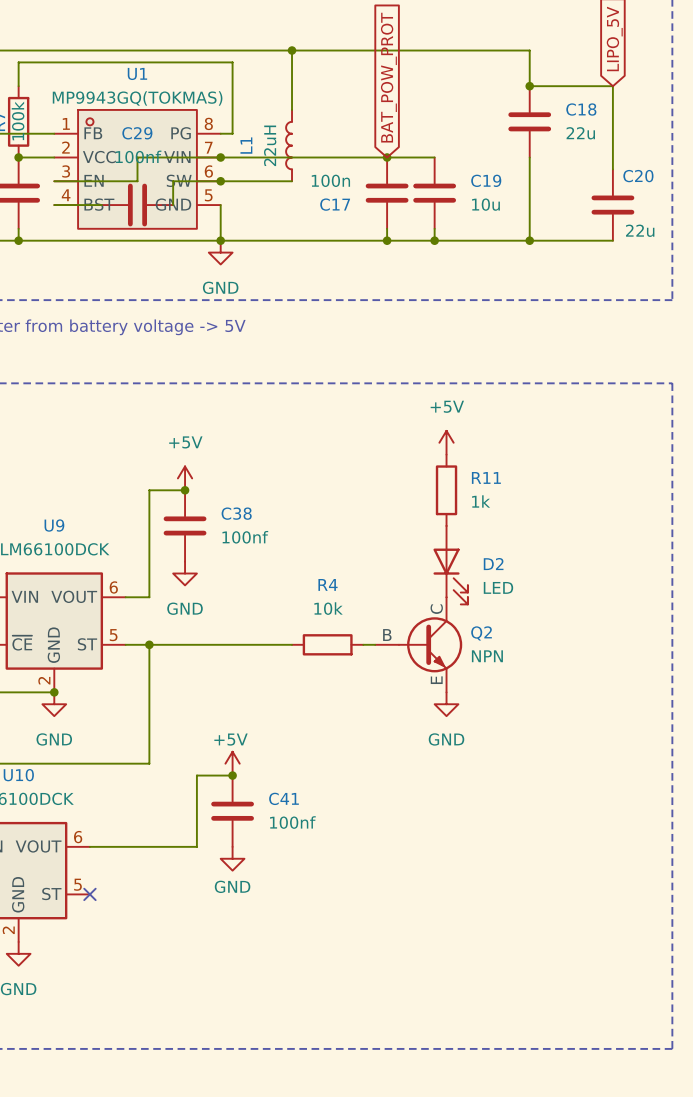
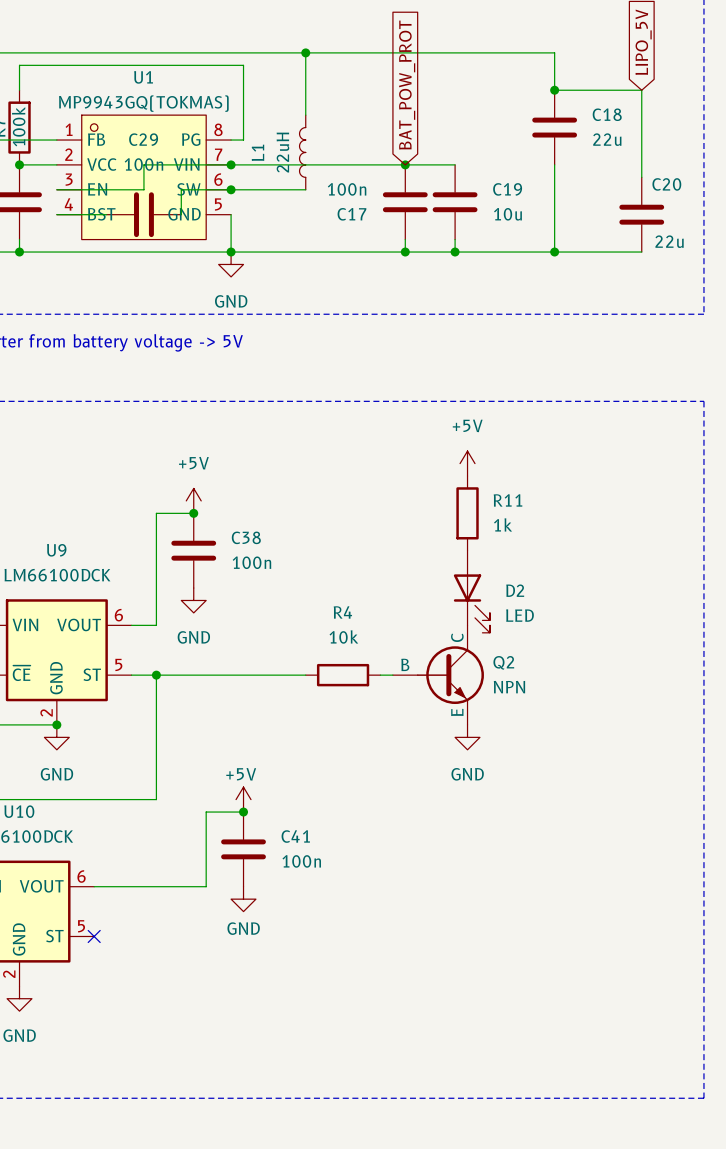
C29 value: 100nf (138, 156) -> 100n (143, 164)
C38 value: 100nf (245, 537) -> 100n (251, 562)
C41 value: 100nf (292, 822) -> 100n (301, 861)

